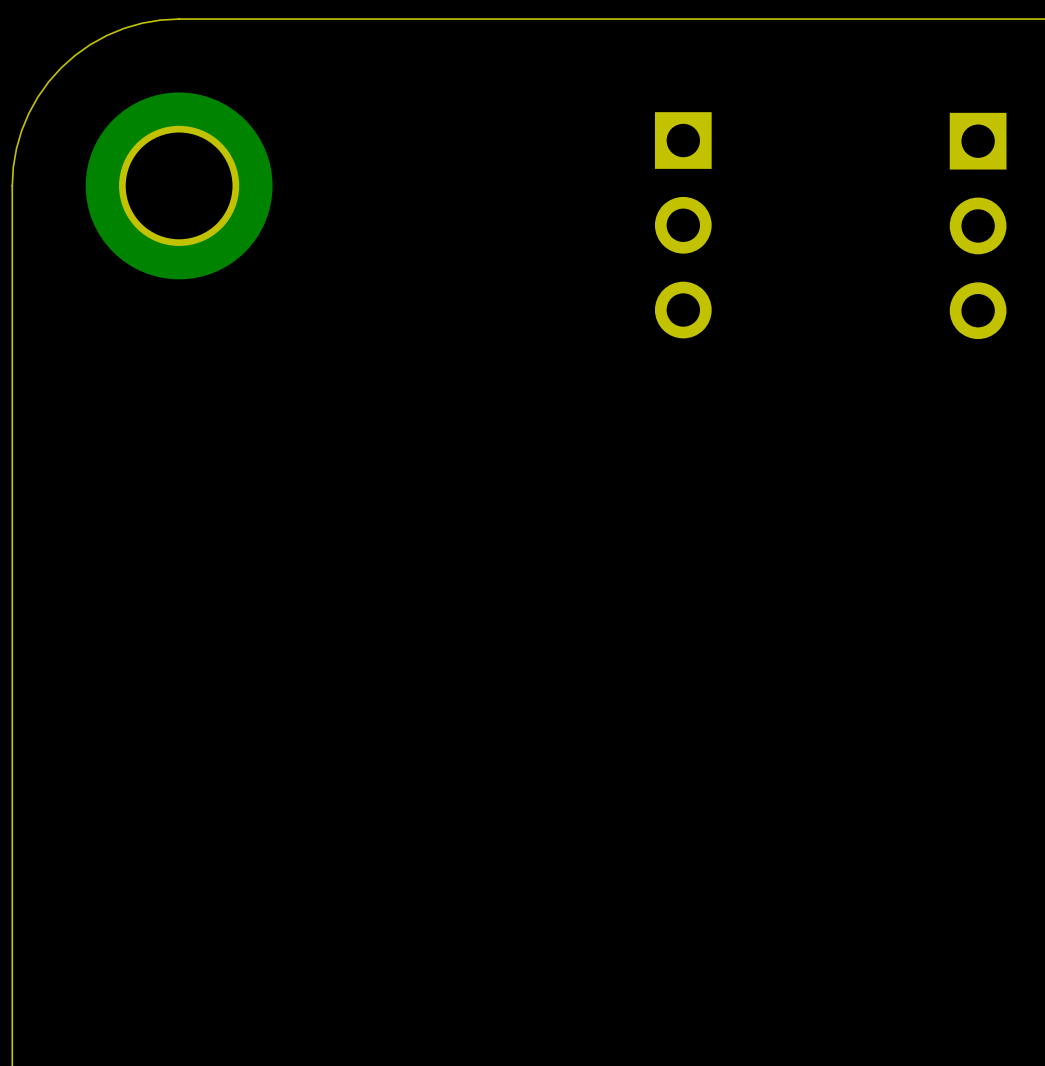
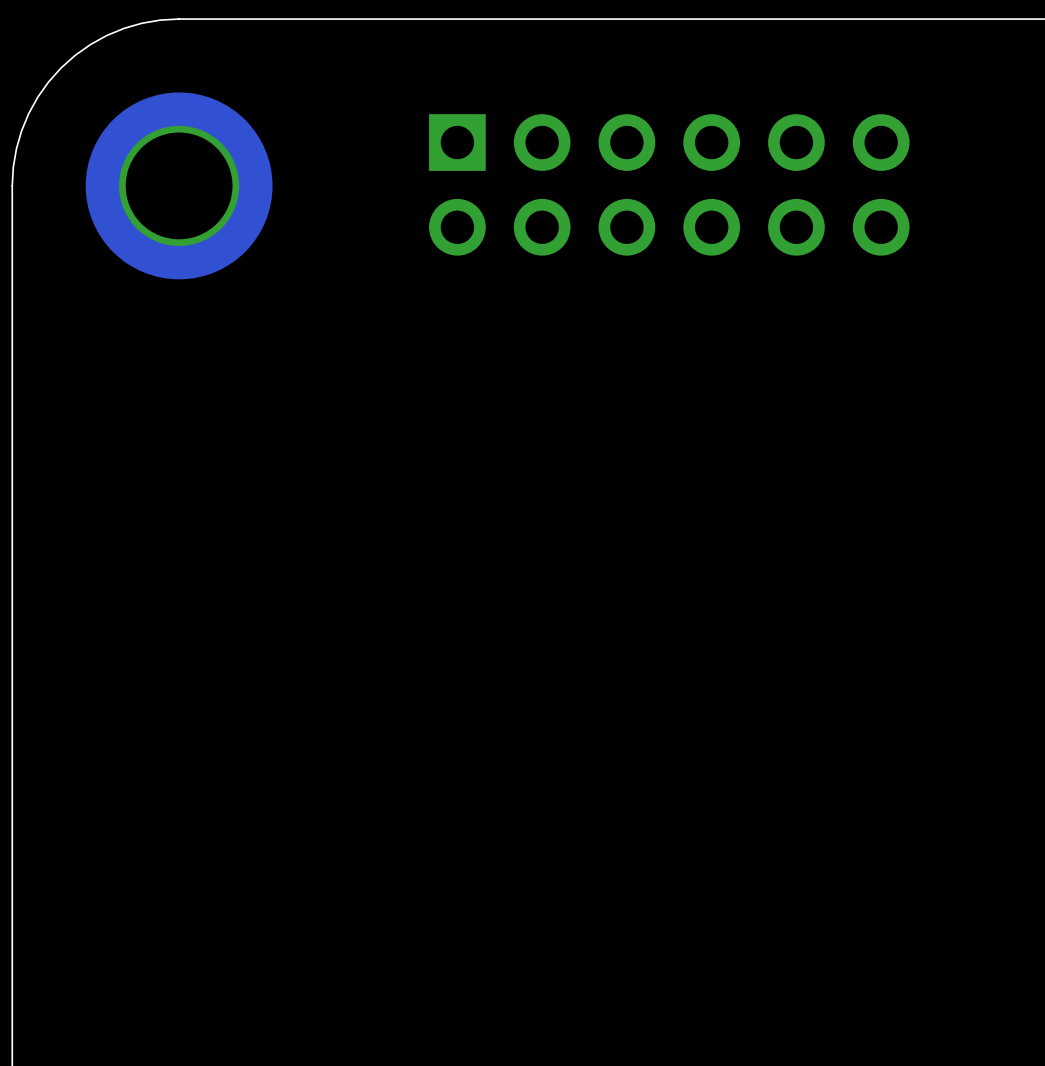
part: none -> (669, 184)
part: (683, 225) -> none
part: (978, 225) -> none

